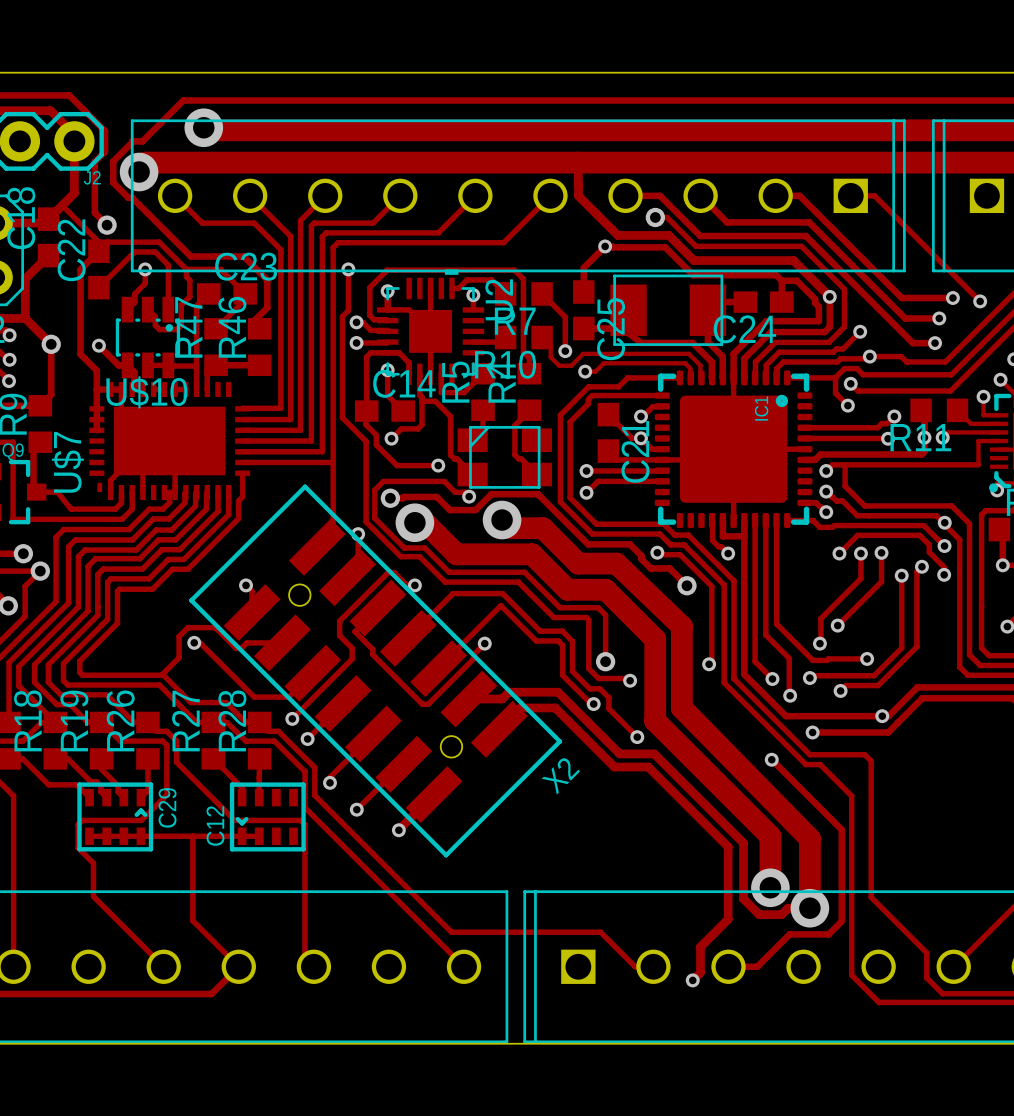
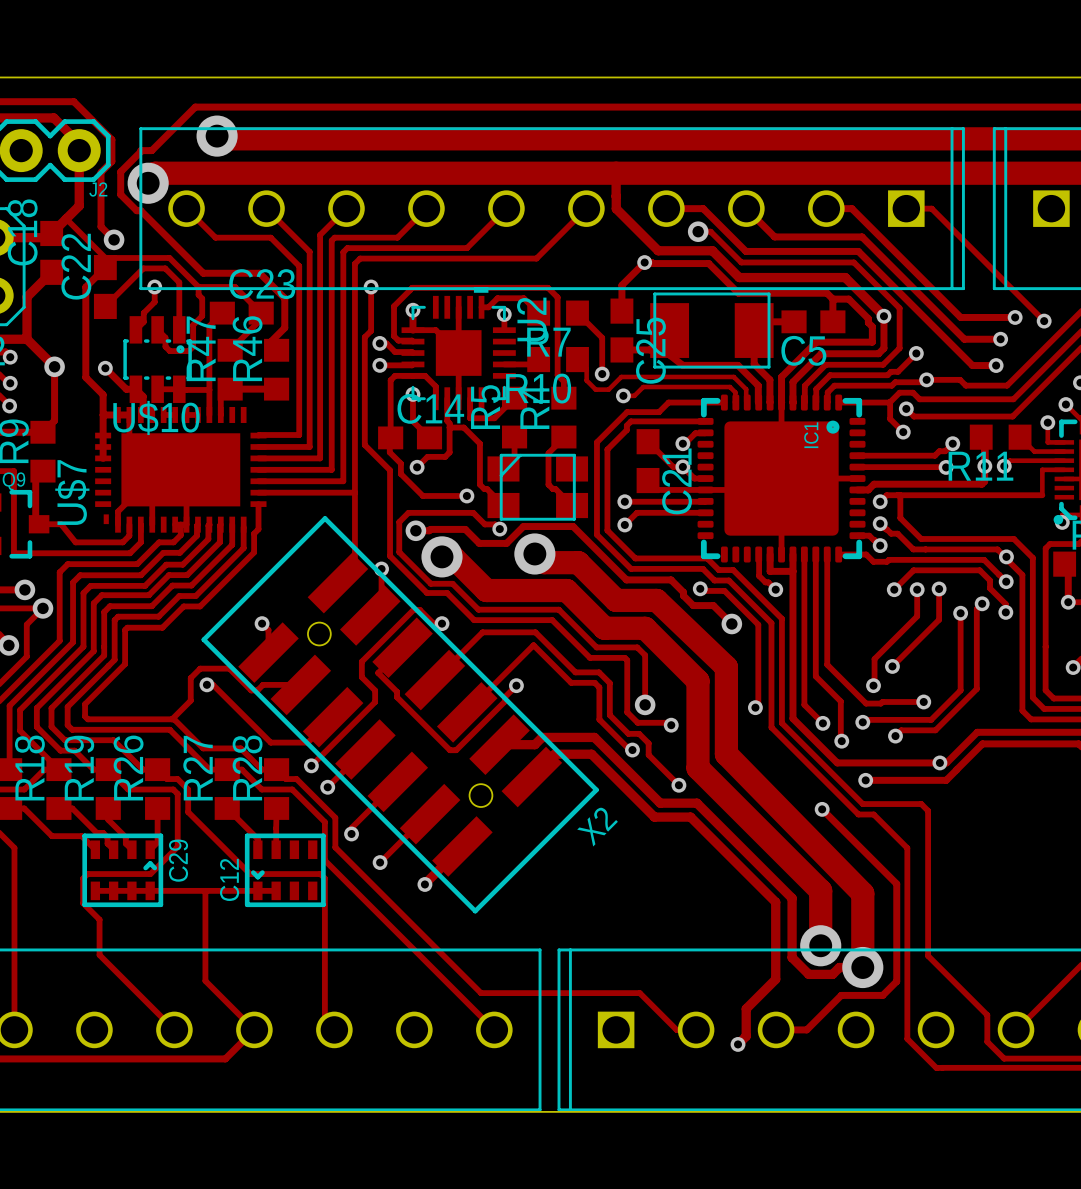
C24 name: C24 (744, 329) -> C5 (803, 350)

